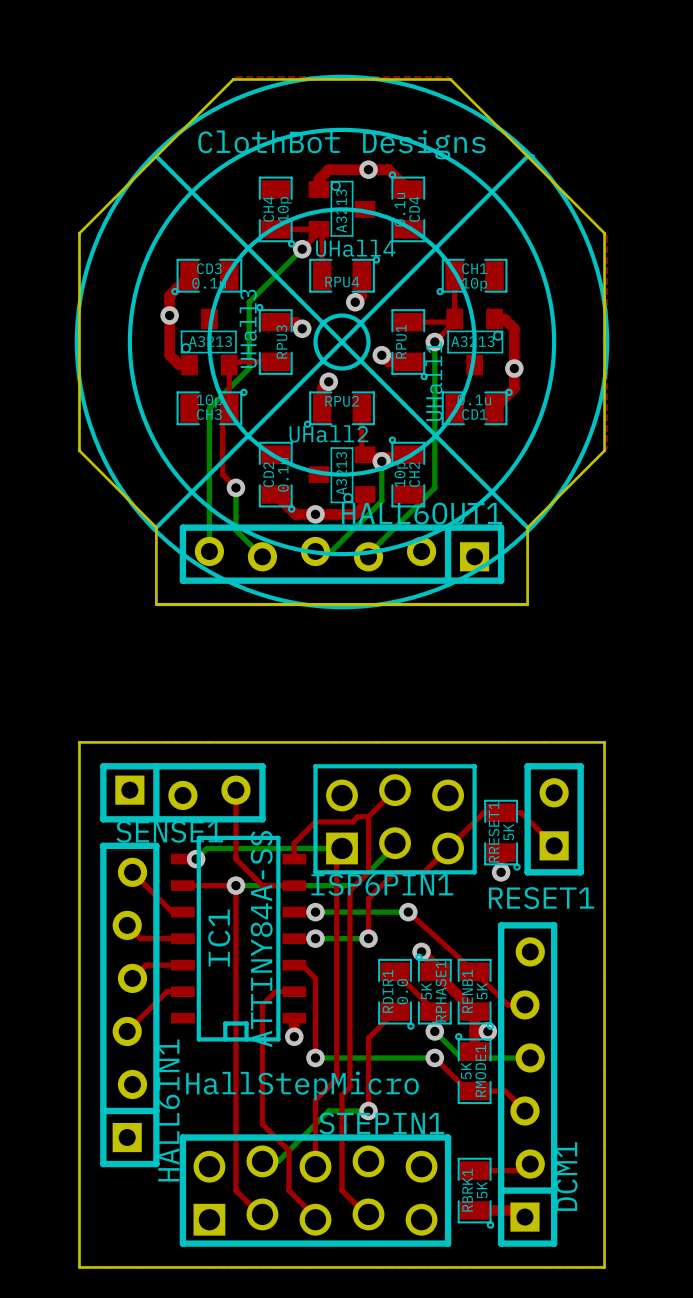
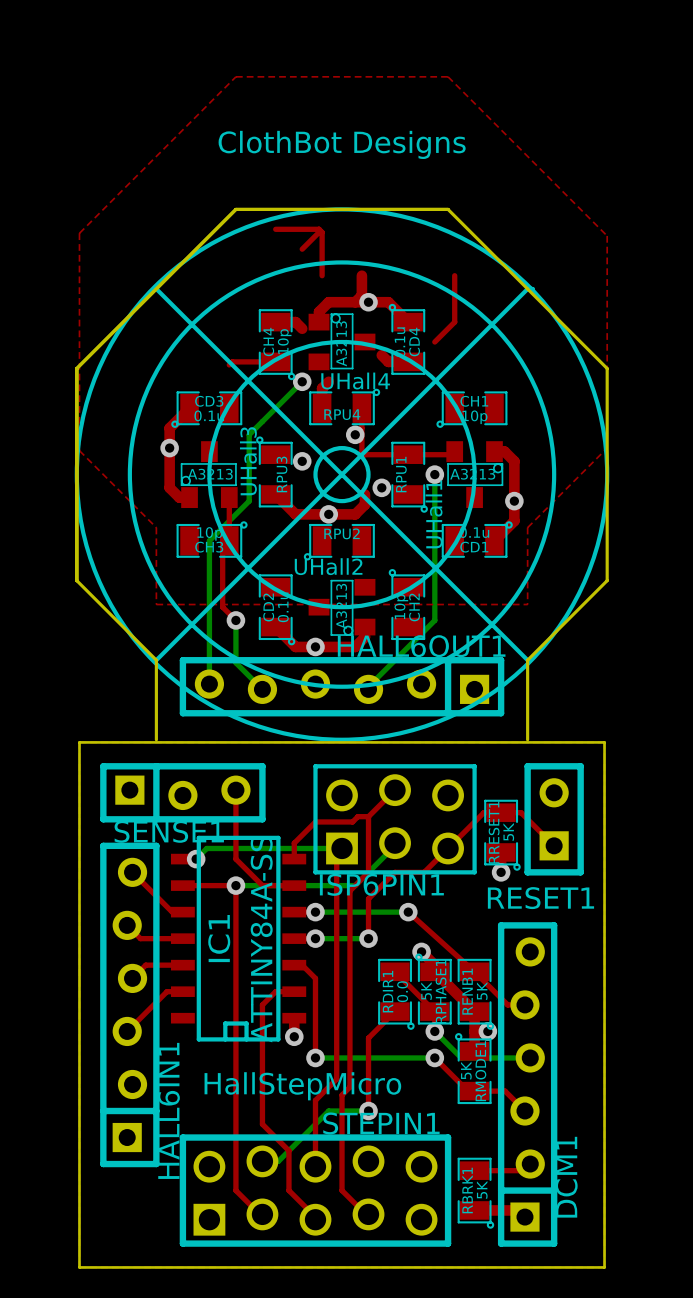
board edge: (233, 79) (79, 233) (79, 450) (156, 527) (156, 604) (527, 604) (527, 527) (604, 450) (604, 233) (450, 79) (233, 79) -> none
line: (156, 156) (527, 527) -> (156, 288) (527, 660)
line: (532, 156) (527, 156) (156, 527) -> (532, 288) (527, 288) (156, 660)
via: (368, 169) -> none
top track: (319, 189) (319, 179) (328, 169) (388, 169) (408, 189) -> none
CD4 position: (406, 206) -> (406, 339)
UHall4 position: (342, 209) -> (342, 341)
CH4 position: (277, 212) -> (277, 344)
bottom track: (302, 249) (249, 302) (249, 368) (209, 408) (209, 540) -> (302, 381) (249, 434) (249, 501) (209, 540)
via: (302, 249) -> none
RPU4 position: (344, 274) -> (344, 406)
top track: (189, 275) (169, 295) (169, 355) (179, 364) (189, 364) -> (189, 408) (169, 428) (169, 487) (179, 497) (189, 497)
CD3 position: (206, 277) -> (206, 409)
CH1 position: (471, 277) -> (471, 409)
via position: (355, 302) -> (368, 302)
via: (169, 315) -> none
top track: (454, 319) (451, 322) (408, 322) -> (319, 322) (319, 311) (328, 302) (388, 302) (408, 322)
top track: (494, 319) (504, 319) (514, 328) (514, 388) (494, 408) -> (494, 451) (504, 451) (514, 461) (514, 521) (494, 540)
via: (302, 328) -> none
RPU3 position: (274, 339) -> (274, 471)
UHall3 position: (209, 342) -> (209, 474)
drawing position: (342, 342) -> (342, 474)
drawing position: (342, 342) -> (342, 474)
drawing position: (342, 342) -> (342, 474)
drawing position: (342, 342) -> (342, 474)
bottom track: (434, 342) (434, 474) -> (209, 551) (209, 684)
via: (434, 342) -> none
UHall1 position: (474, 342) -> (474, 474)
RPU1 position: (409, 344) -> (409, 477)
via: (381, 355) -> none
top track: (232, 364) (229, 364) (229, 408) (222, 414) (222, 474) (235, 487) -> (232, 497) (229, 497) (229, 540) (222, 547) (222, 607) (235, 620)
via: (514, 368) -> none
via: none -> (302, 381)
via: (328, 381) -> none
CH3 position: (212, 406) -> (212, 539)
CD1 position: (477, 406) -> (477, 539)
RPU2 position: (339, 409) -> (339, 542)
via: none -> (355, 434)
via: none -> (169, 448)
top track: none -> (454, 451) (451, 454) (408, 454)
via: none -> (302, 461)
bottom track: (381, 461) (381, 501) (331, 551) (315, 551) -> none
via: (381, 461) -> none
CH2 position: (406, 471) -> (406, 604)
UHall2 position: (342, 474) -> (342, 607)
via: none -> (434, 474)
CD2 position: (277, 477) -> (277, 609)
bottom track: (235, 487) (235, 530) (262, 556) -> (235, 620) (235, 662) (262, 689)
via: (235, 487) -> none
via: none -> (381, 487)
bottom track: (434, 487) (368, 554) (368, 556) -> (434, 487) (434, 620) (368, 686) (368, 689)
via: none -> (514, 501)
via position: (315, 514) -> (328, 514)
HALL6OUT1 position: (342, 554) -> (342, 686)
via: none -> (235, 620)
top track: none -> (275, 627) (295, 646) (355, 646) (364, 637) (364, 627)
via: none -> (315, 646)
board edge: none -> (156, 739) (156, 660) (76, 580) (76, 368) (235, 209) (448, 209) (607, 368) (607, 580) (527, 660) (527, 739)

